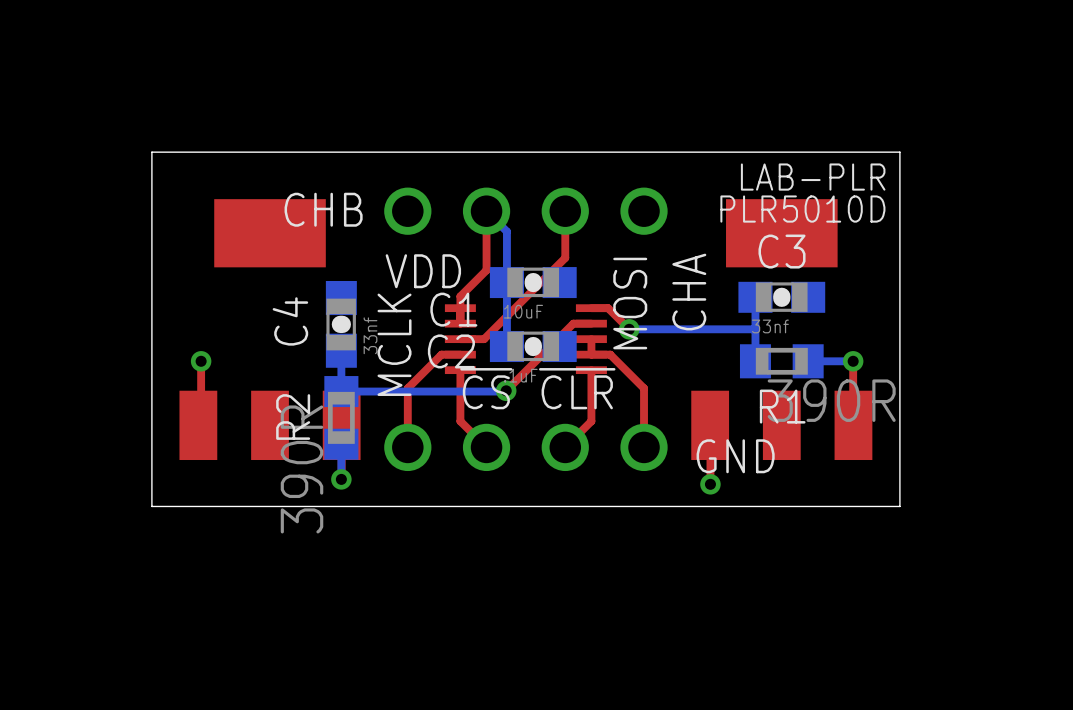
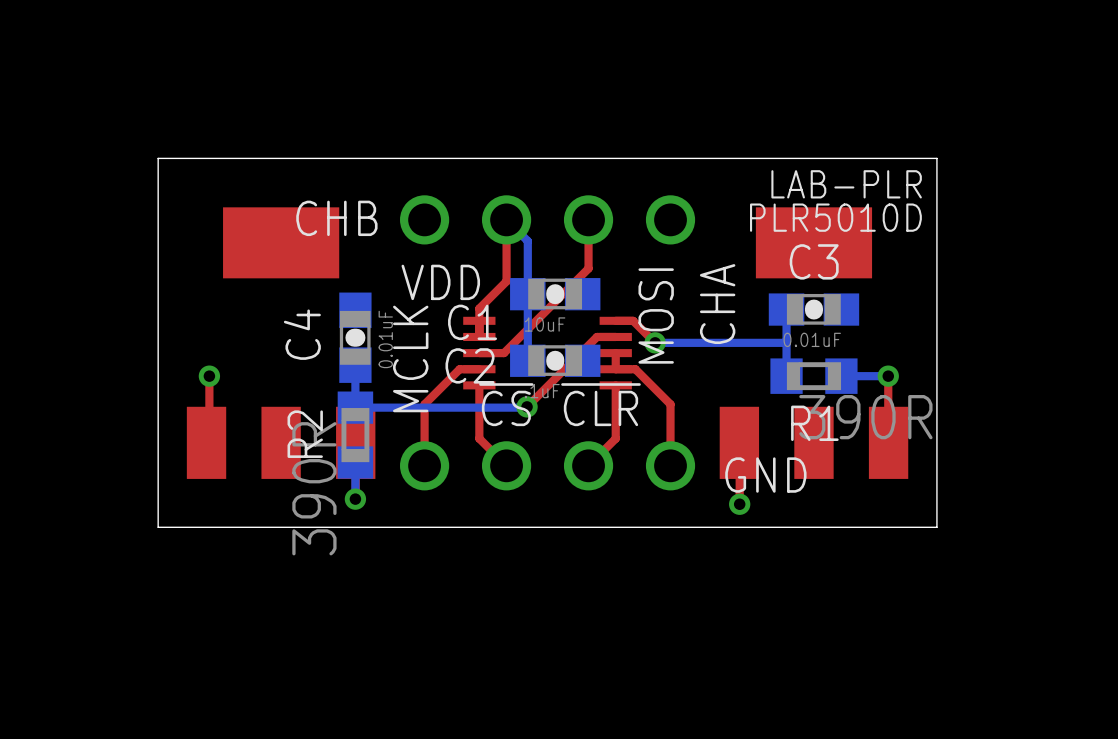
C3 value: 33nf (770, 326) -> 0.01uF (812, 339)
C4 value: 33nf (370, 335) -> 0.01uF (385, 339)

